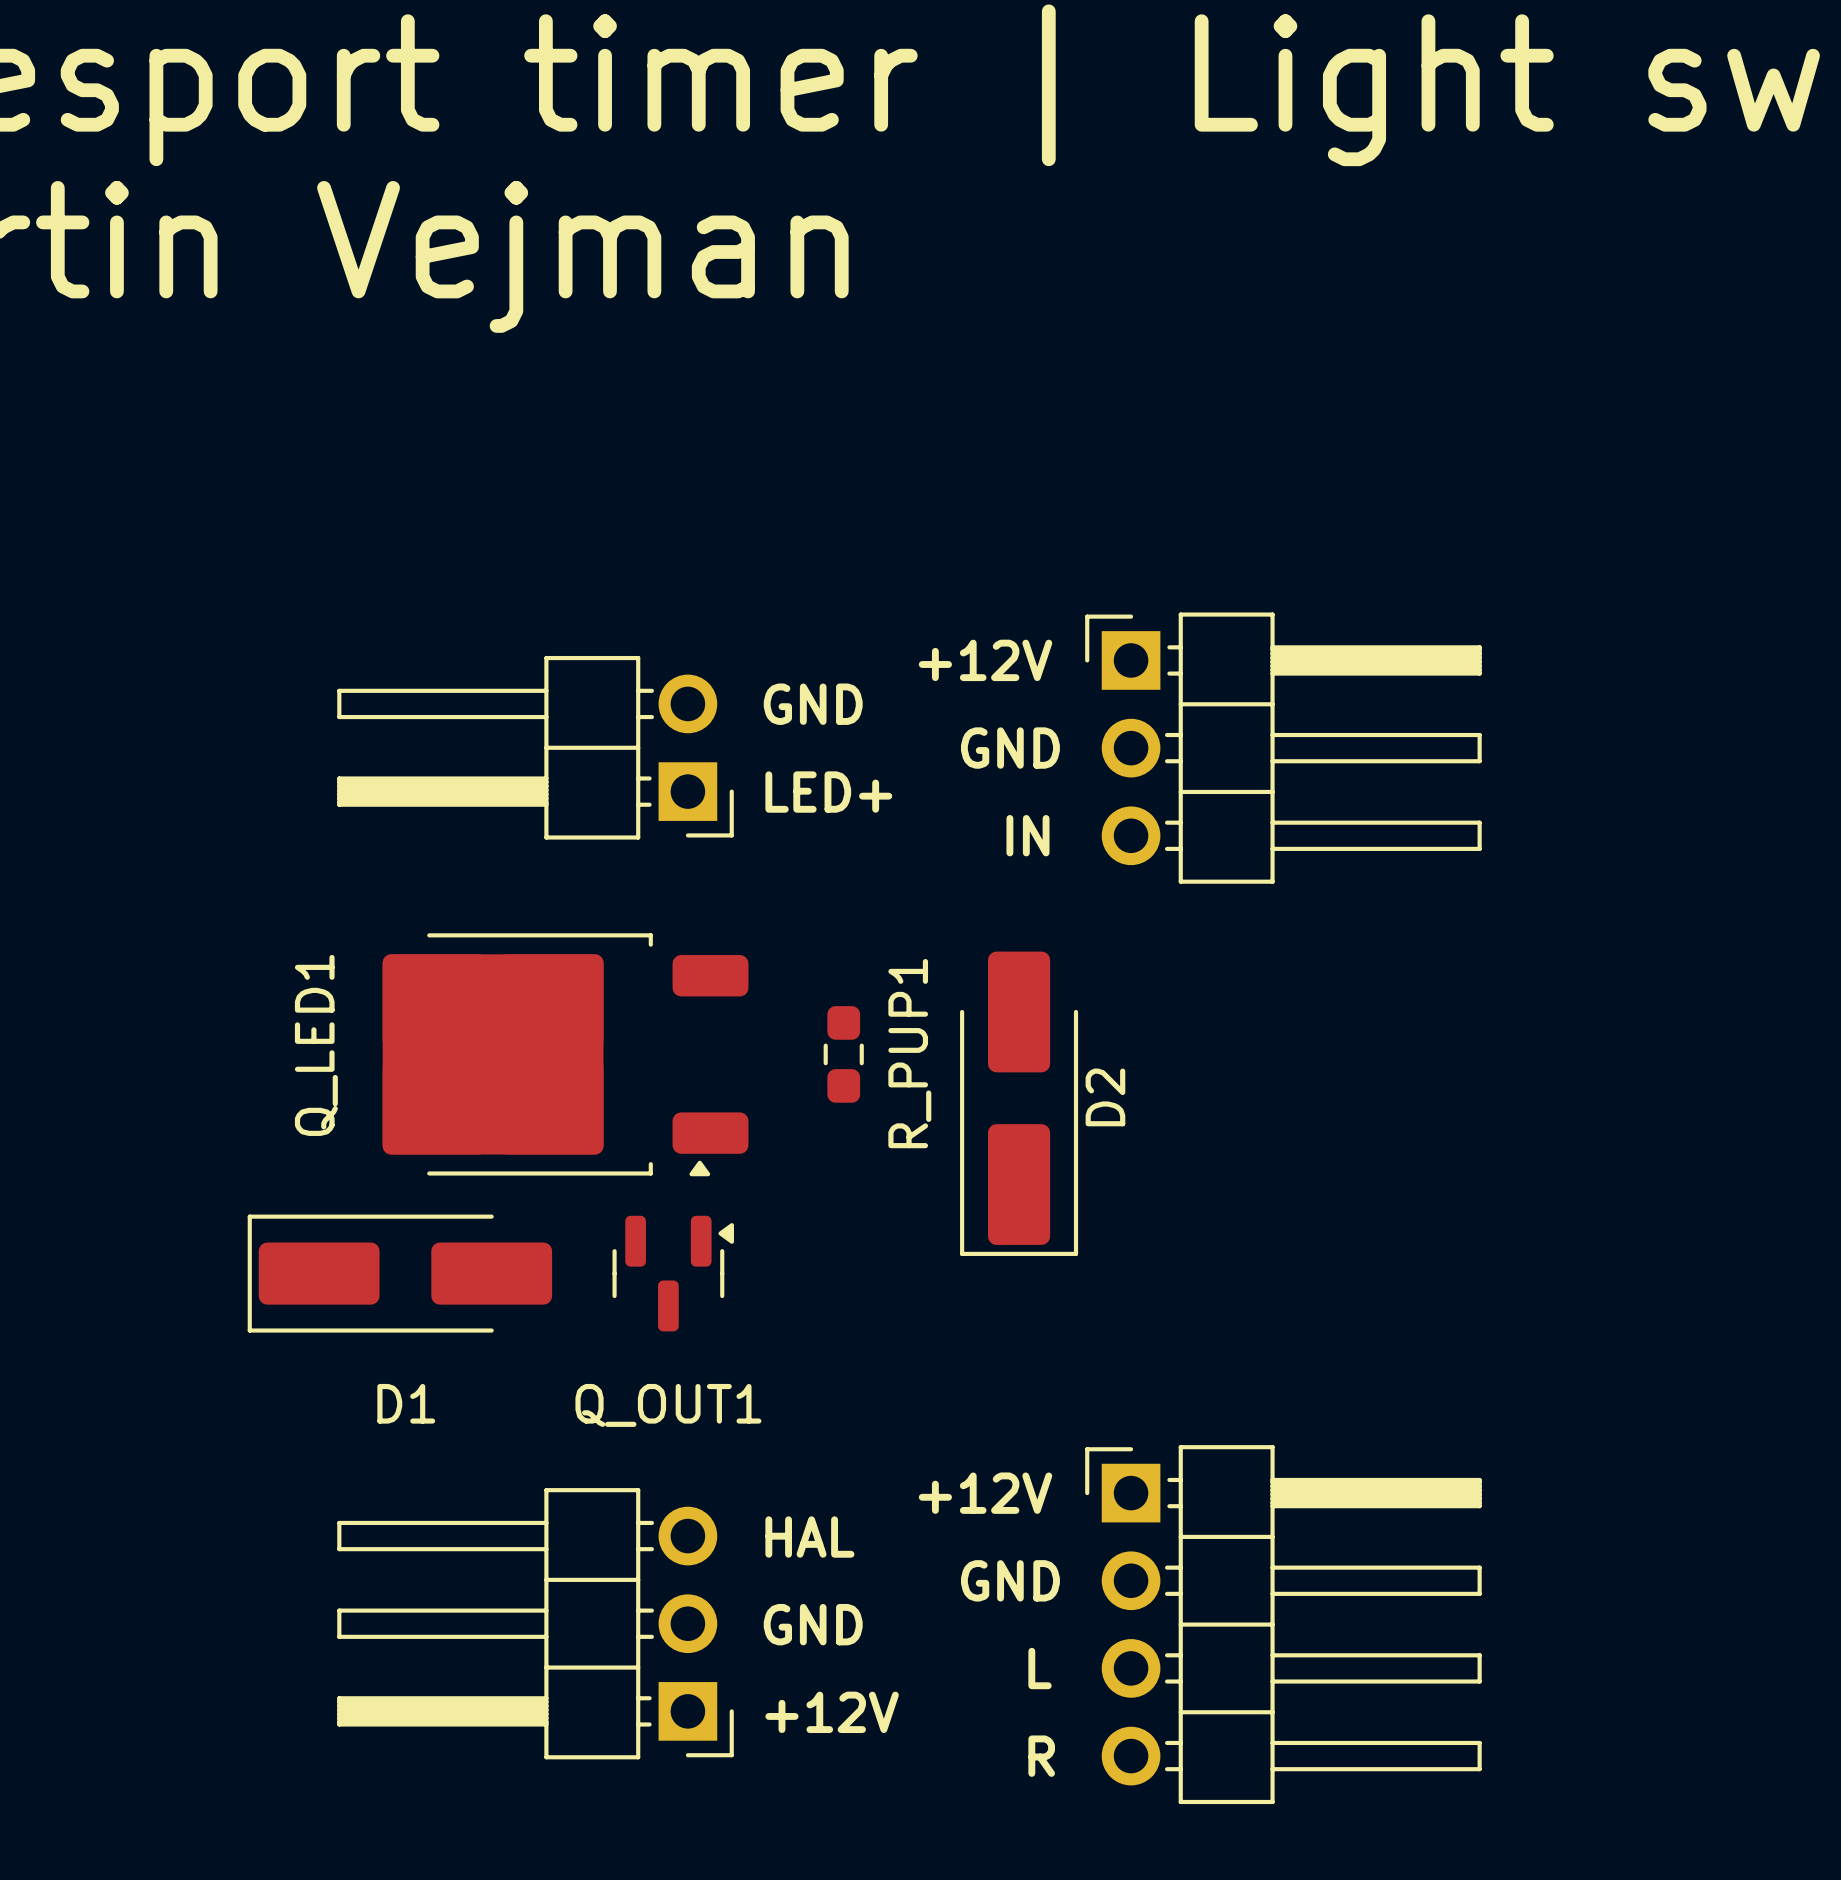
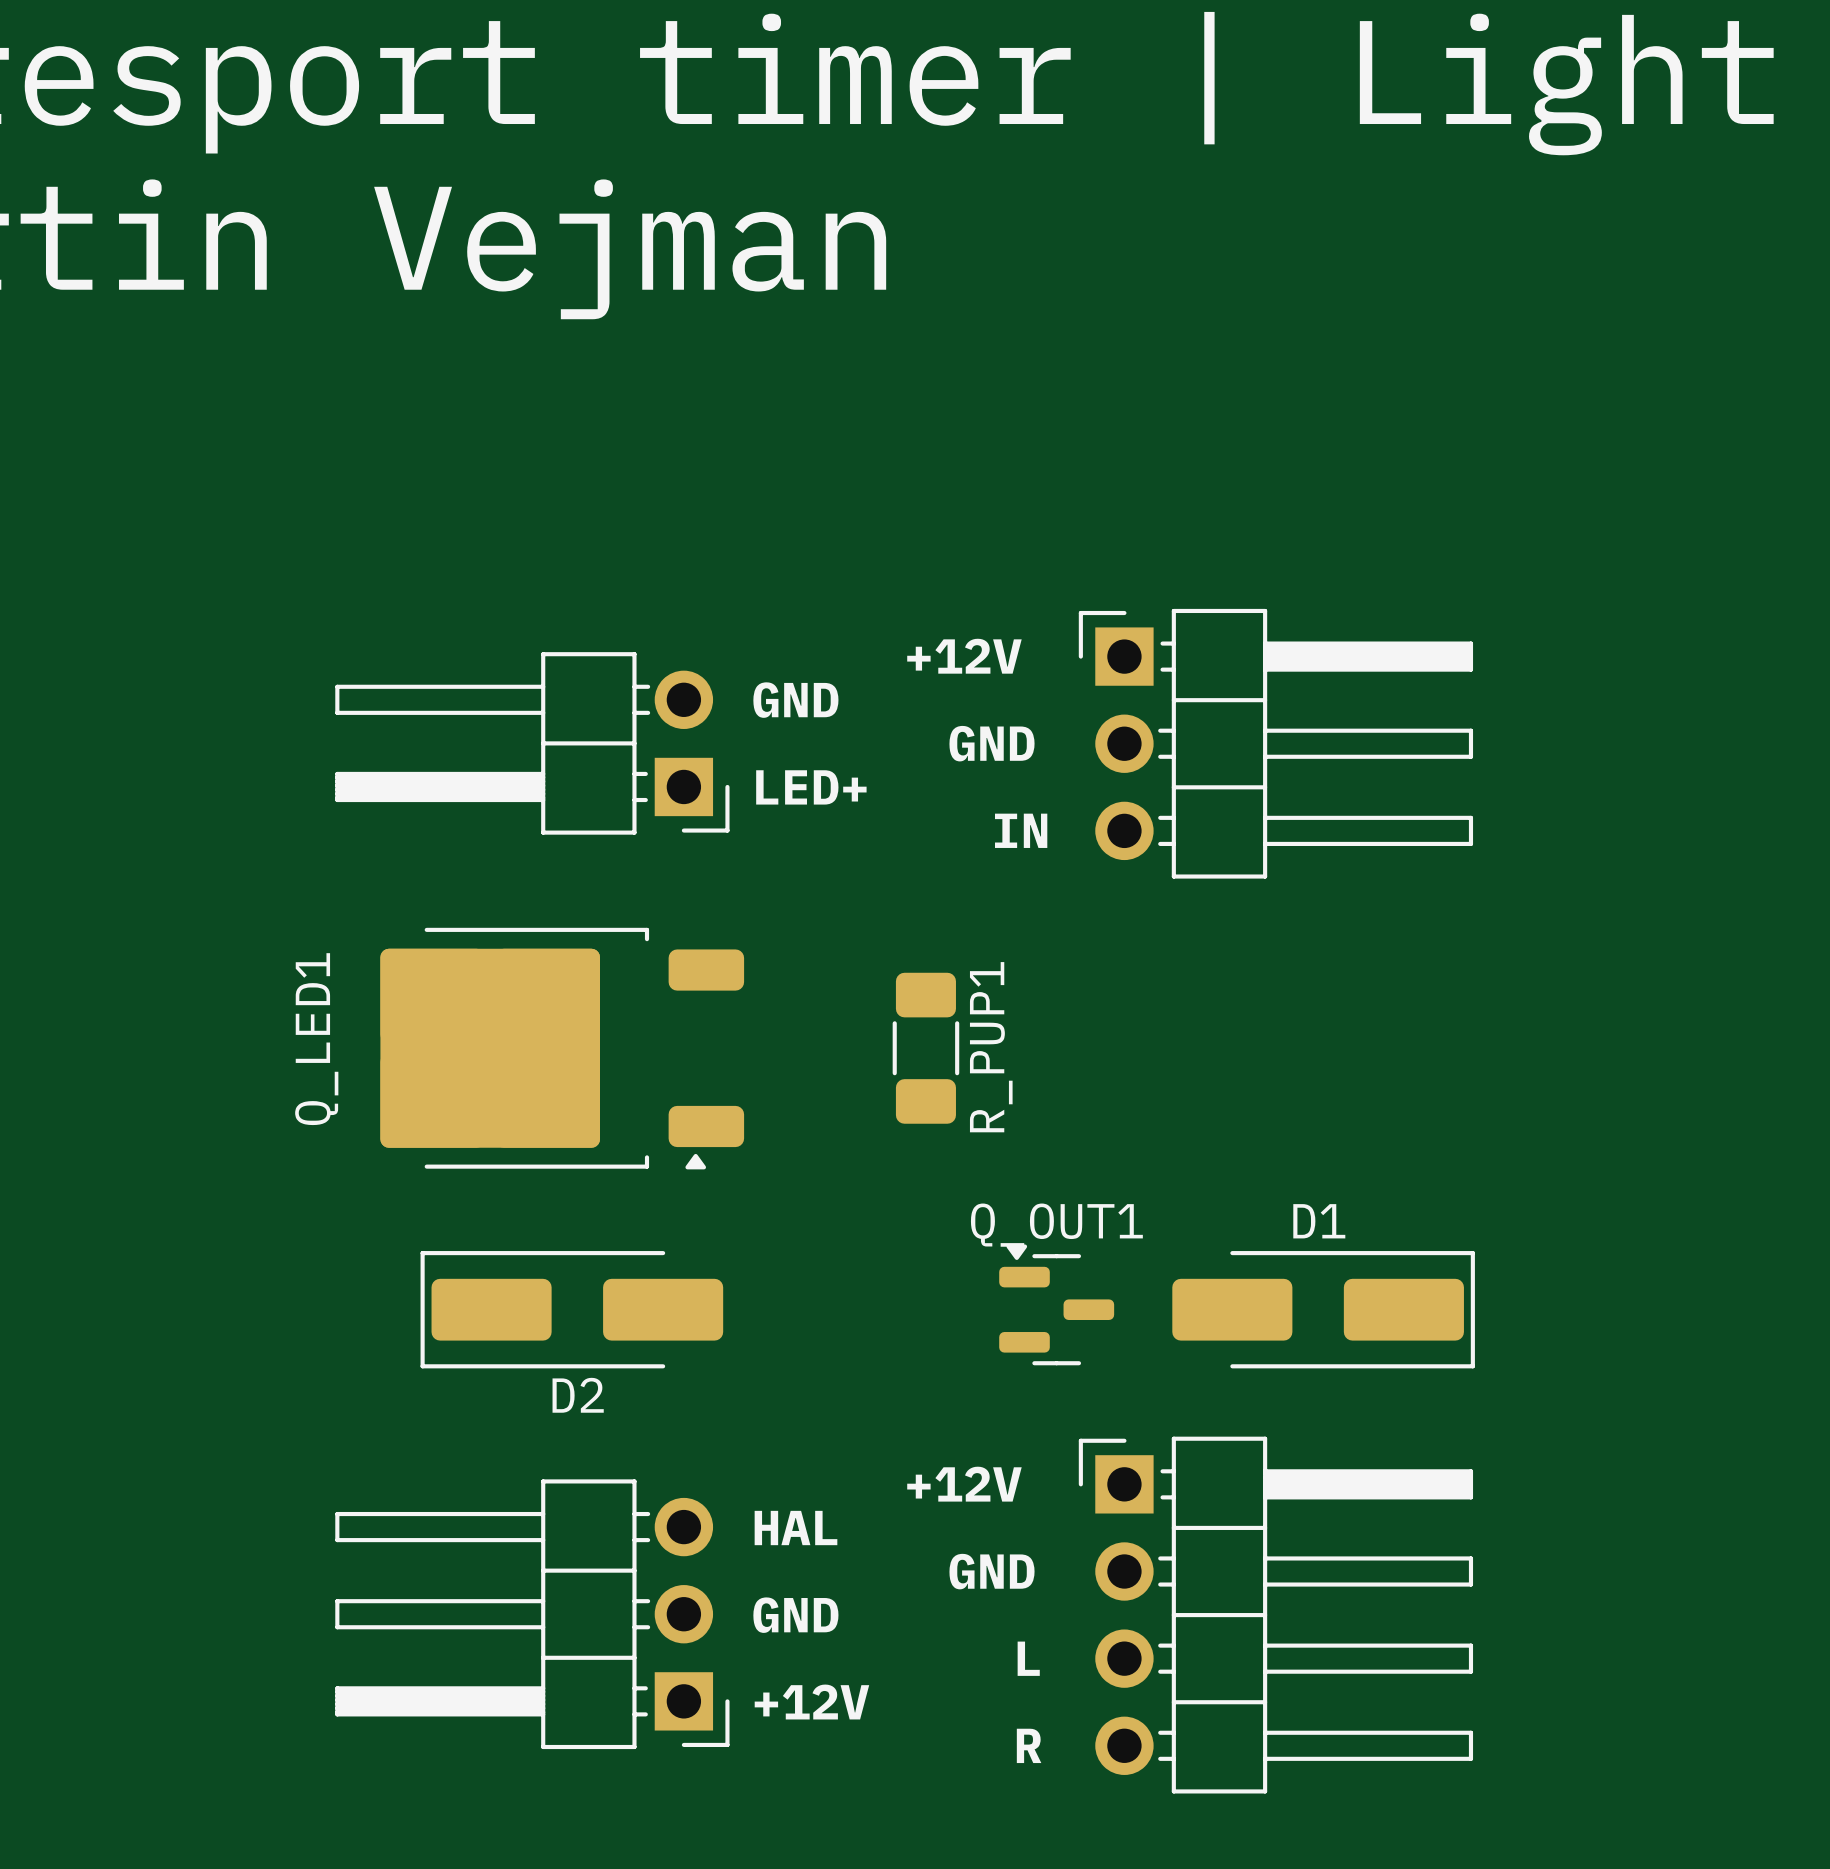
R_PUP1 footprint: [823, 1006, 864, 1103] -> [892, 972, 960, 1124]
D2 rotation: 0° (1019, 1103) -> 90° clockwise (571, 1309)
D2 position: (1019, 1103) -> (571, 1309)
D1 rotation: 0° (399, 1273) -> 180° (1323, 1309)
D1 position: (399, 1273) -> (1323, 1309)
Q_OUT1 rotation: 0° (673, 1273) -> 90° counterclockwise (1056, 1304)
Q_OUT1 position: (673, 1273) -> (1056, 1304)
Q_OUT1 name position: Q_OUT1 (668, 1405) -> Q_OUT1 (1056, 1225)

